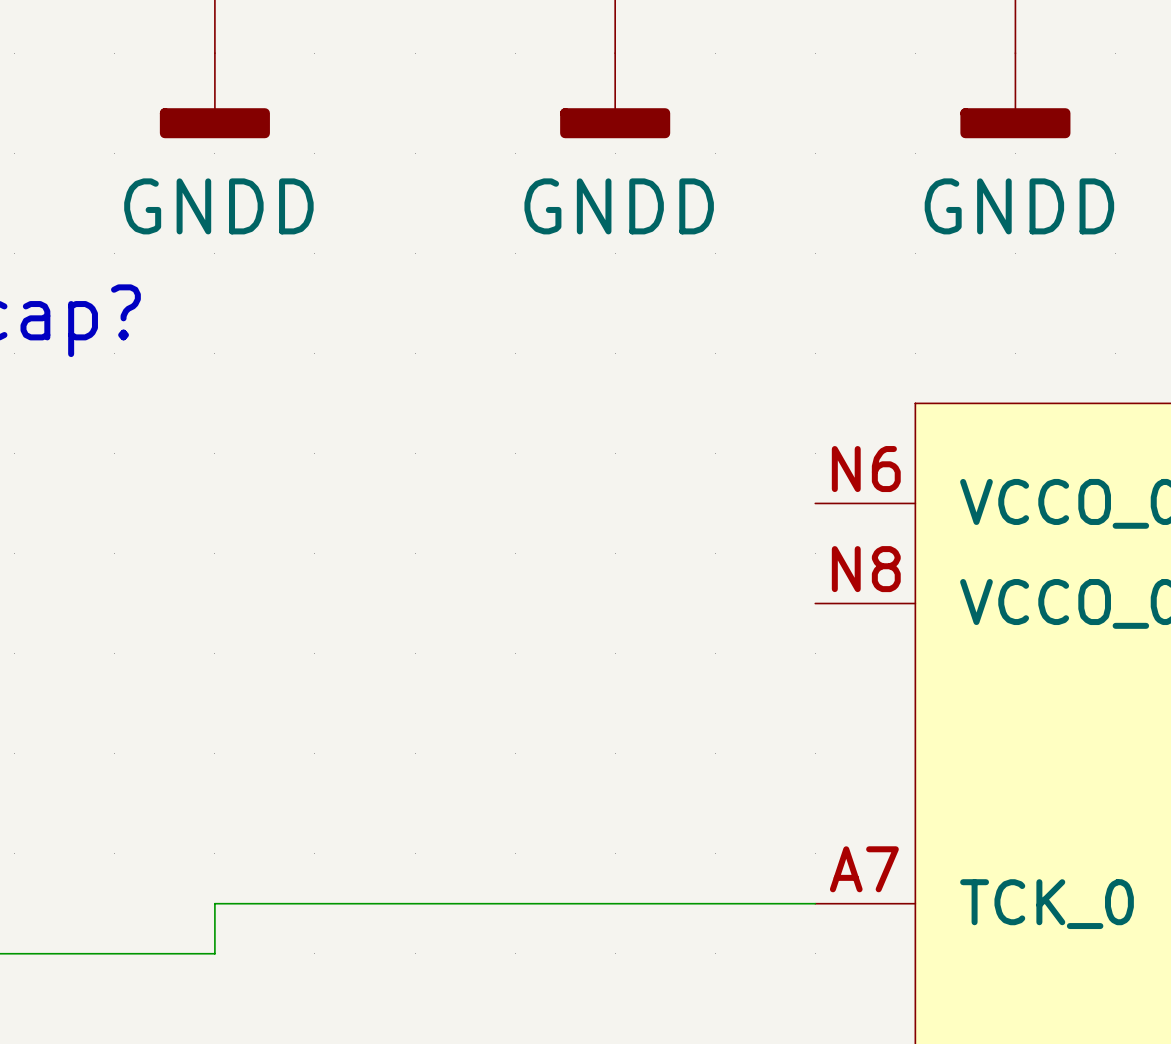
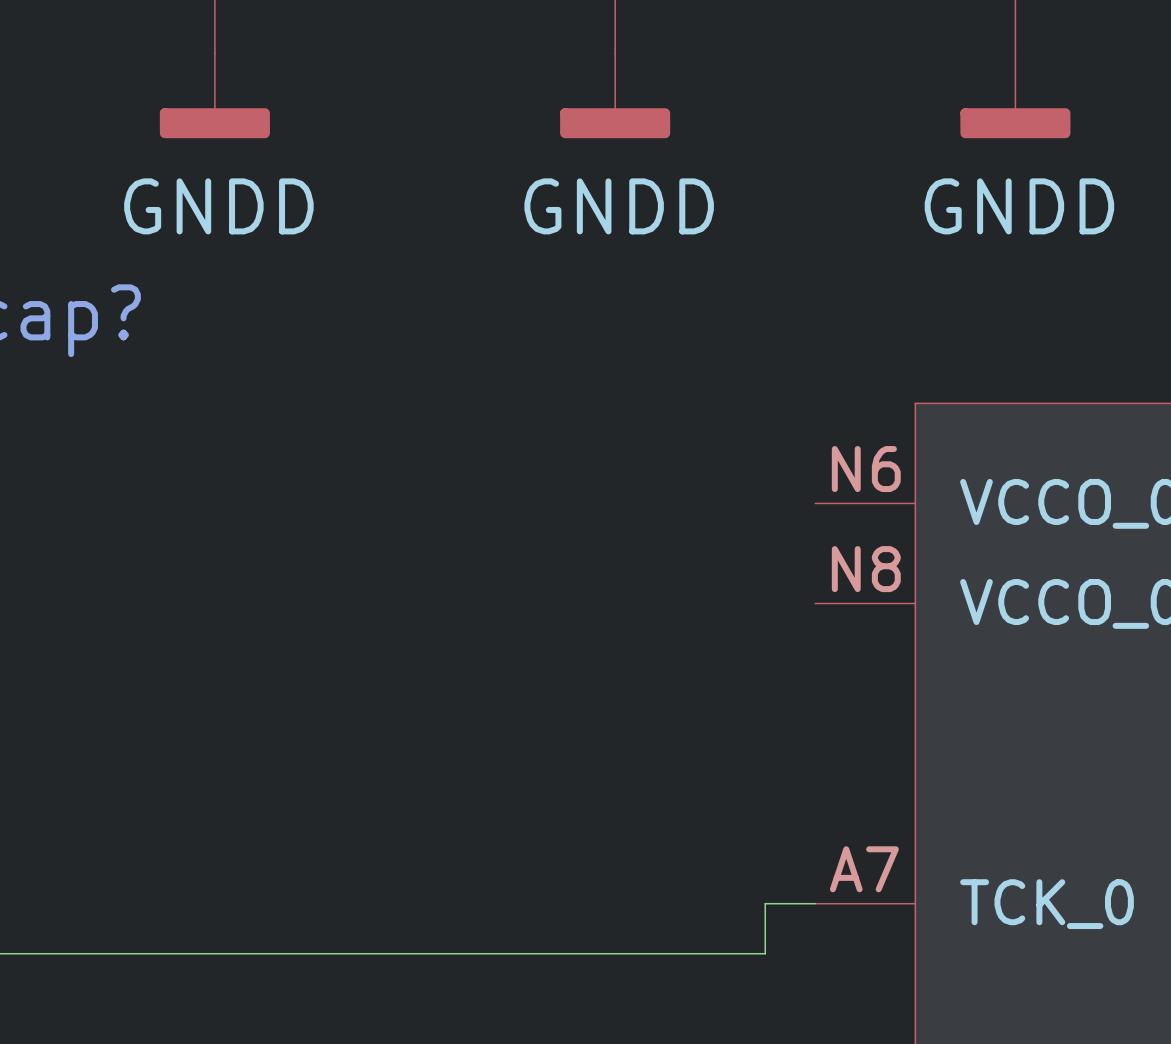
wire: (765, 903) (214, 903) (214, 953) -> (765, 903) (765, 953) (214, 953)

